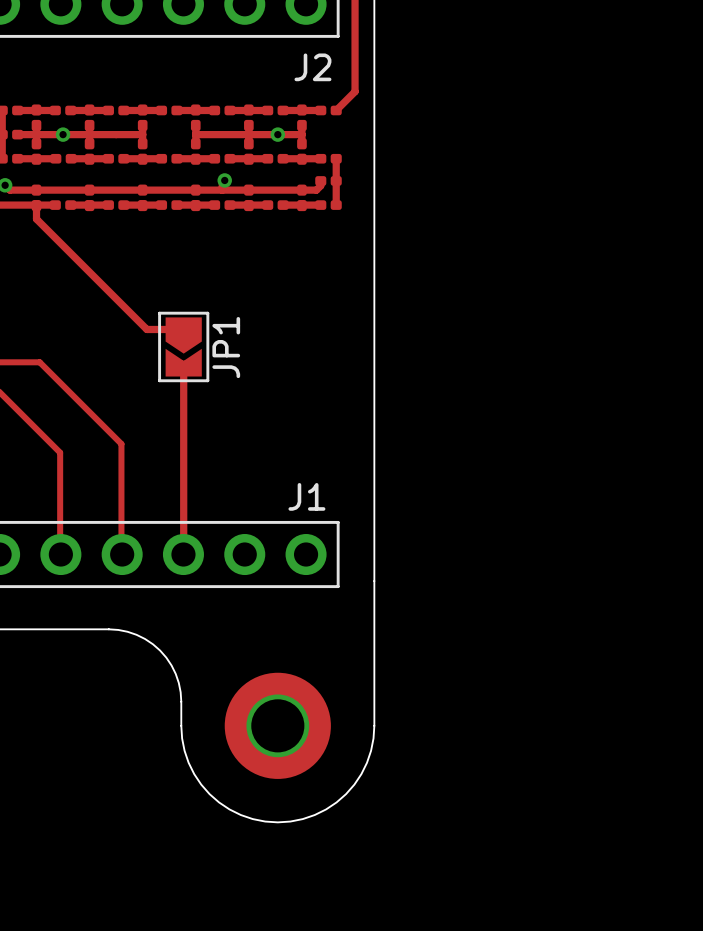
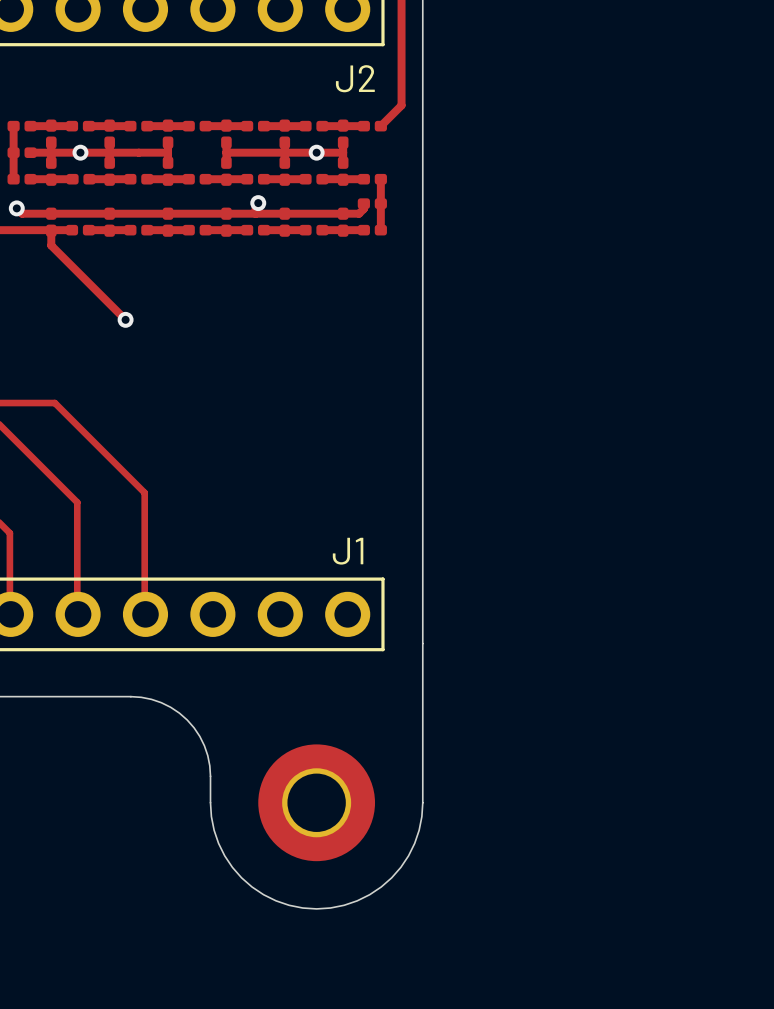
track: (104, 286) (146, 329) (183, 329) -> none
via: none -> (125, 319)
JP1: (183, 346) -> none
track: (183, 364) (183, 554) -> none

